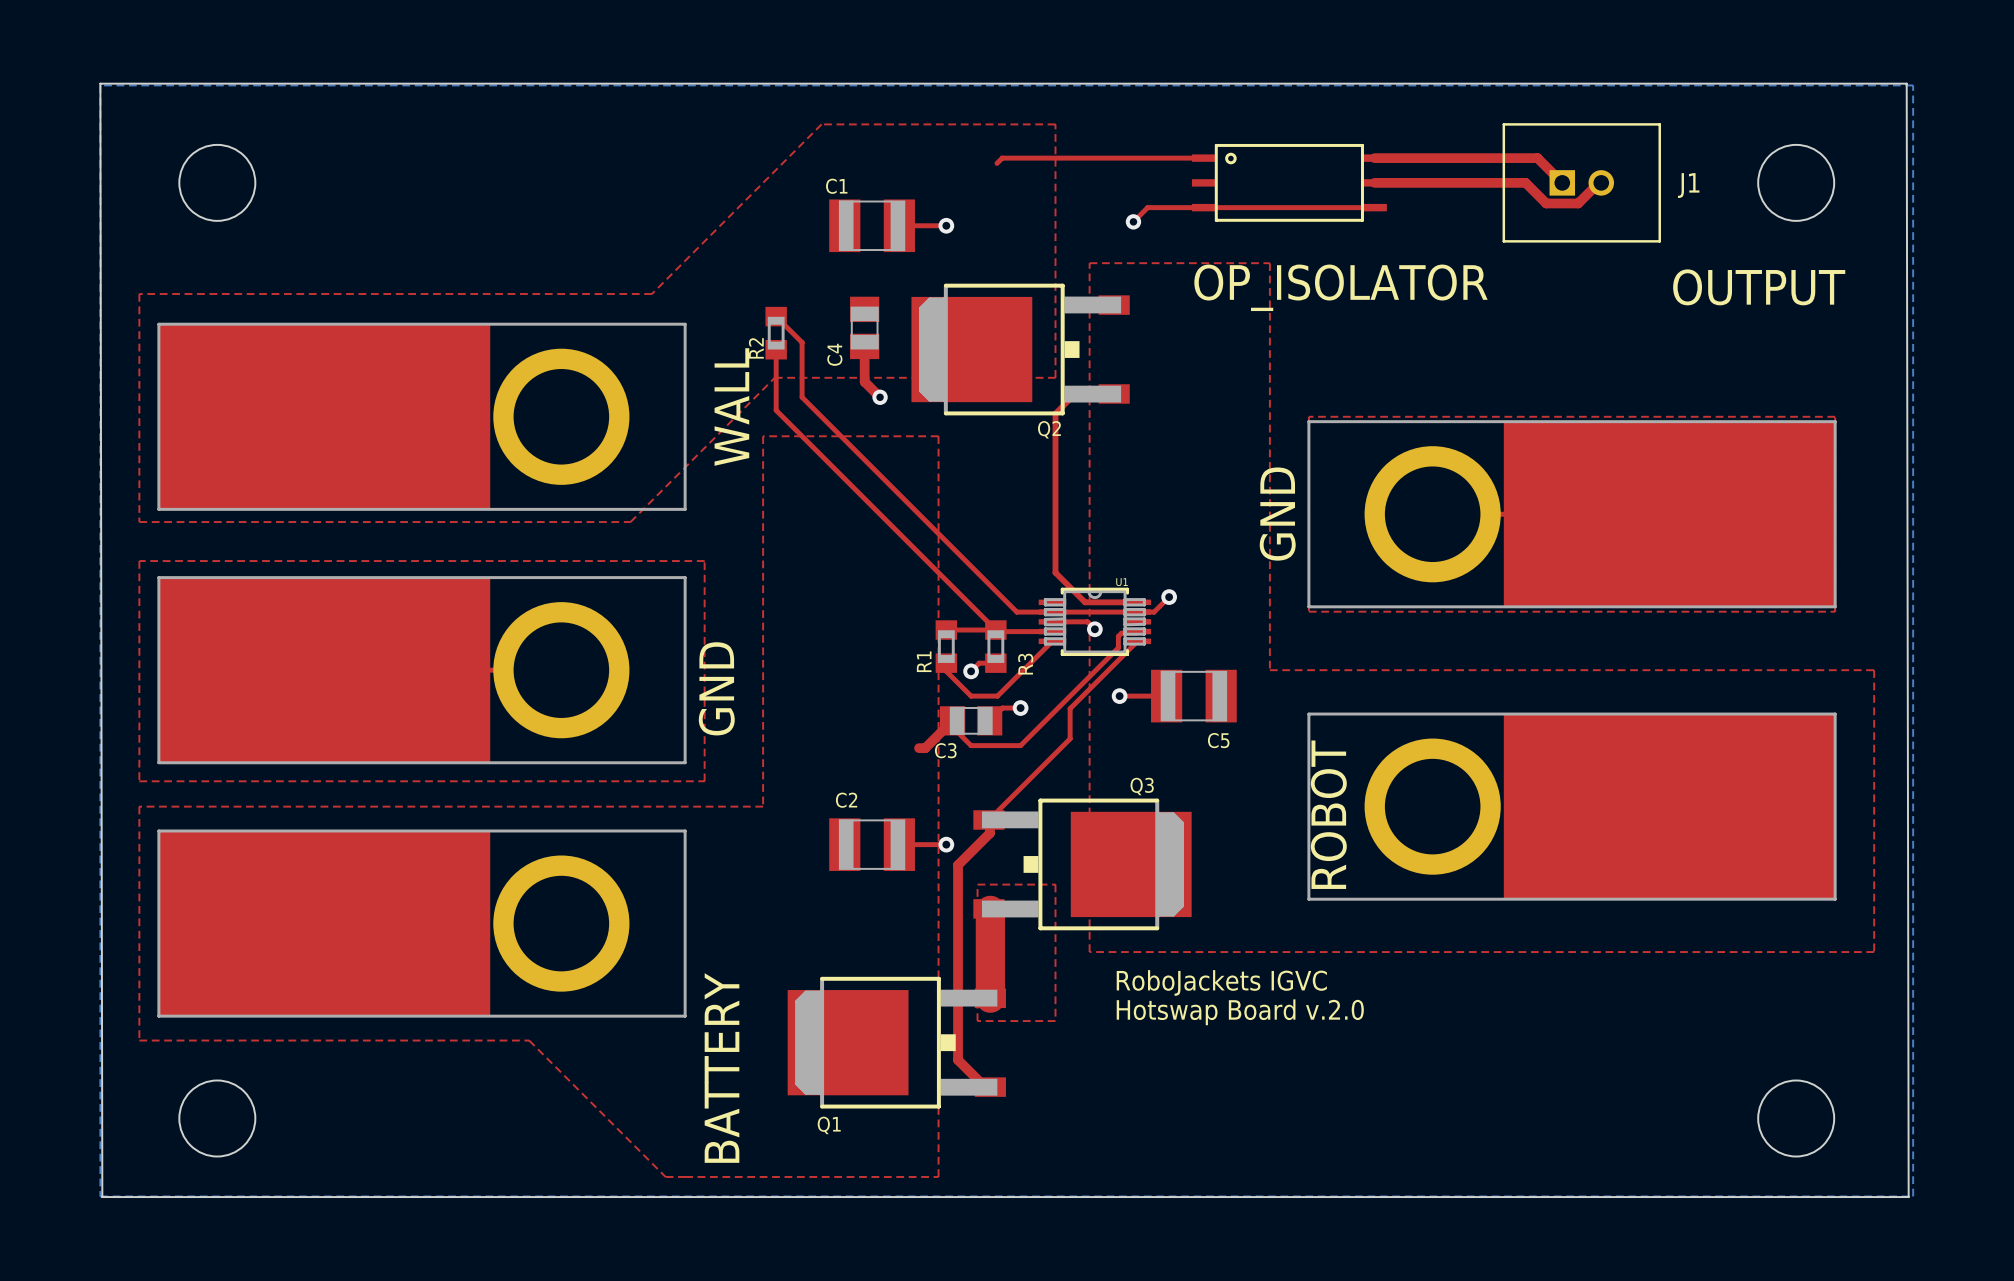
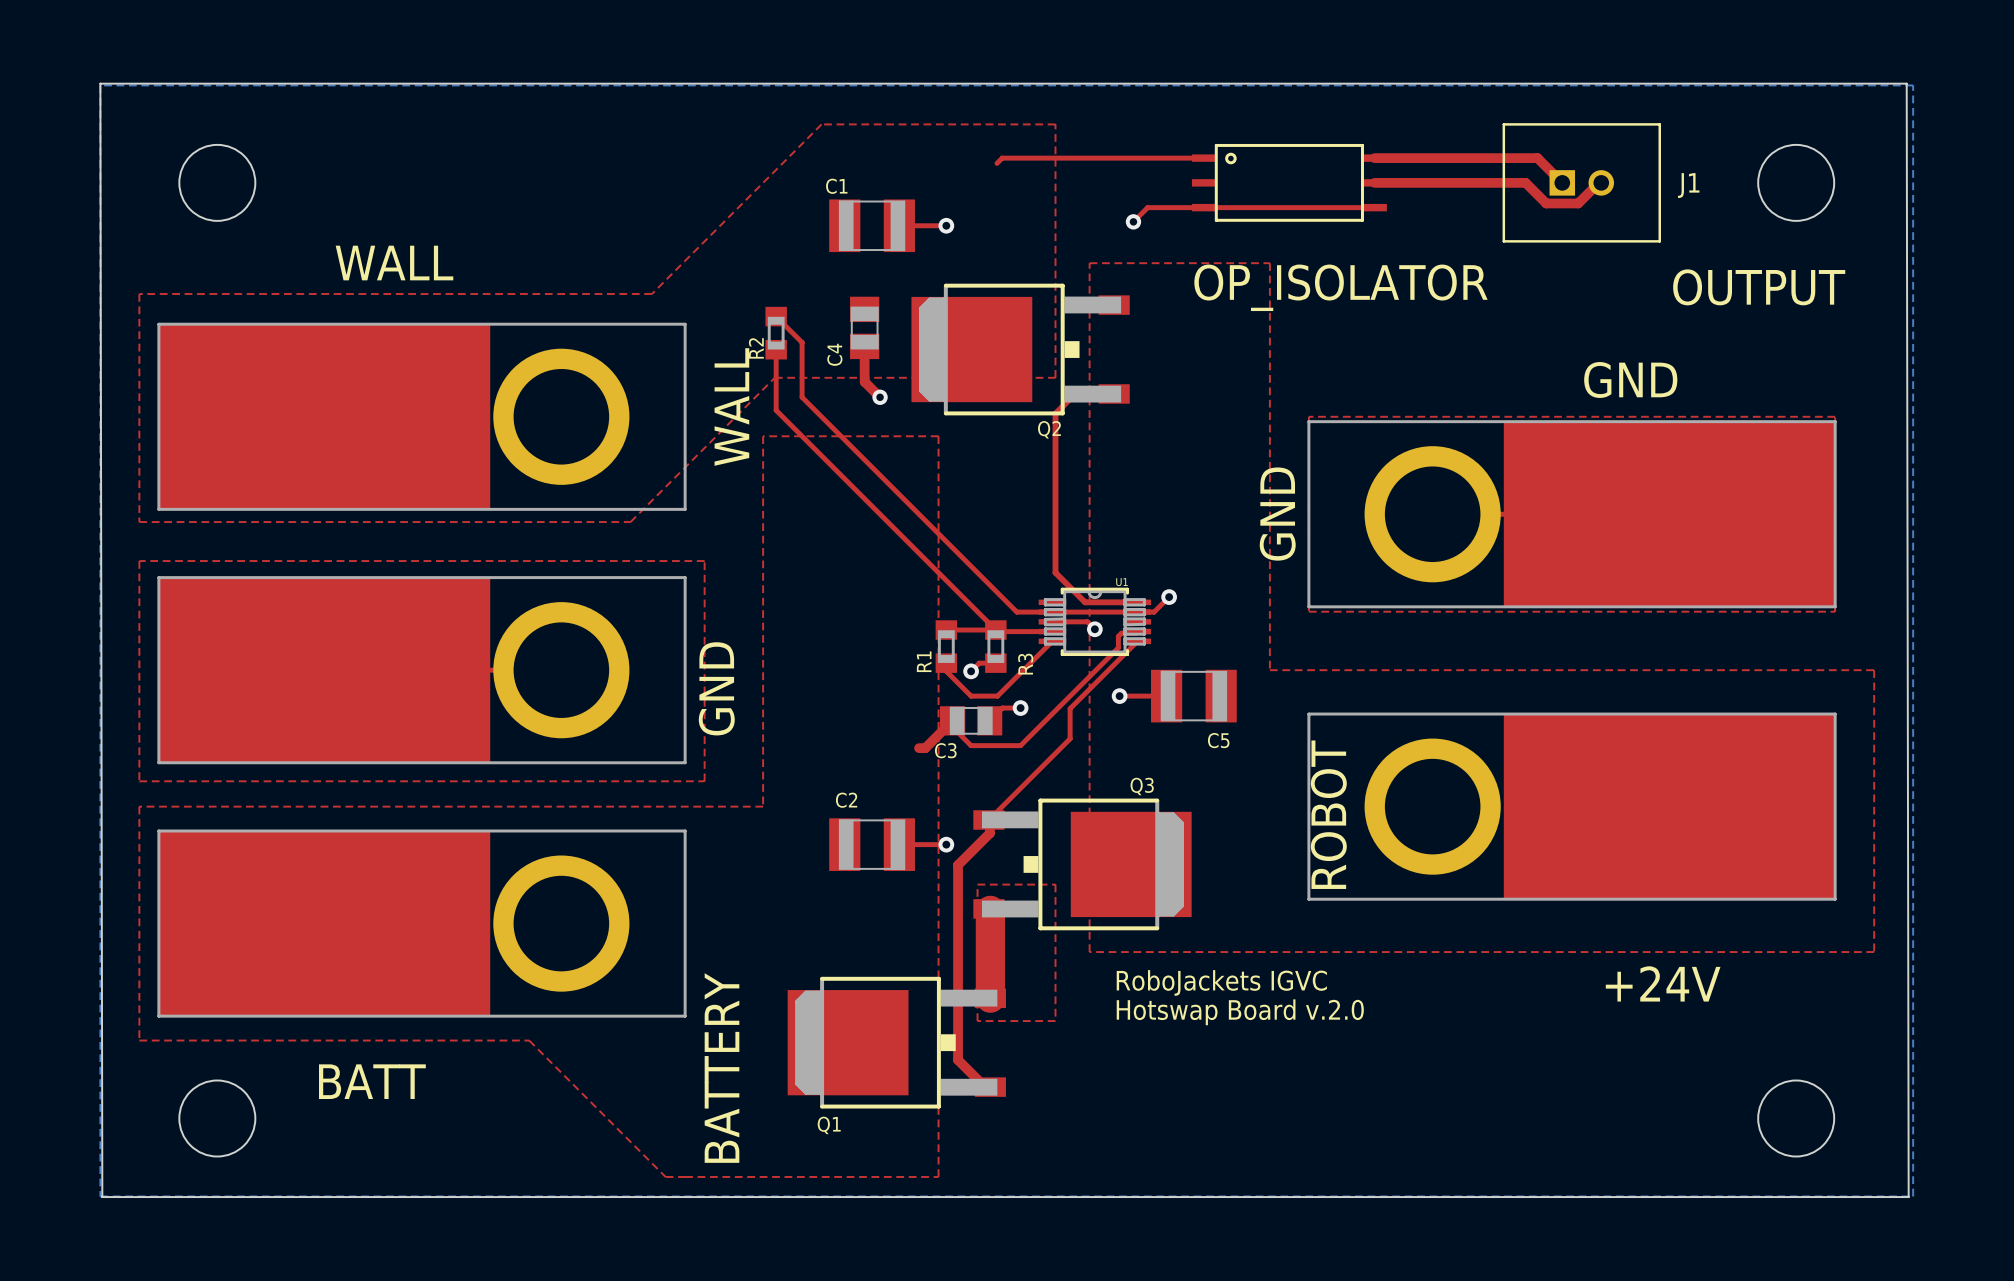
text: none -> WALL (394, 263)
text: none -> GND (1630, 379)
text: none -> +24V (1663, 983)
text: none -> BATT (372, 1081)

